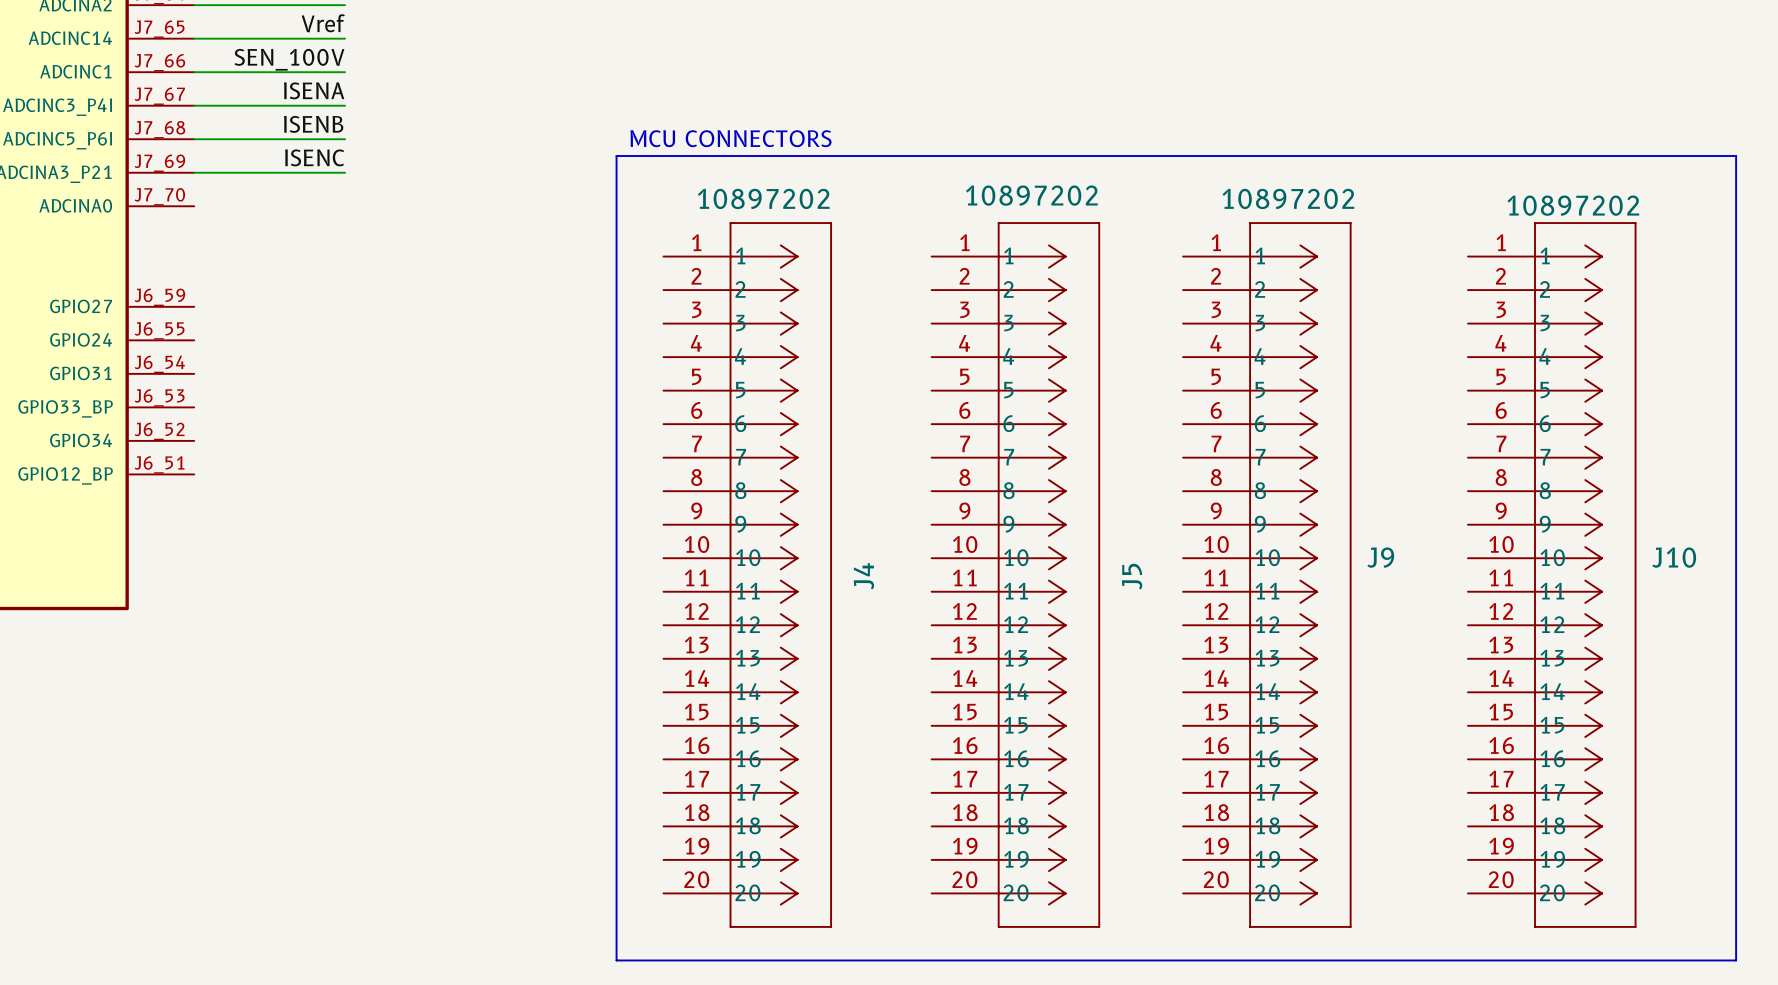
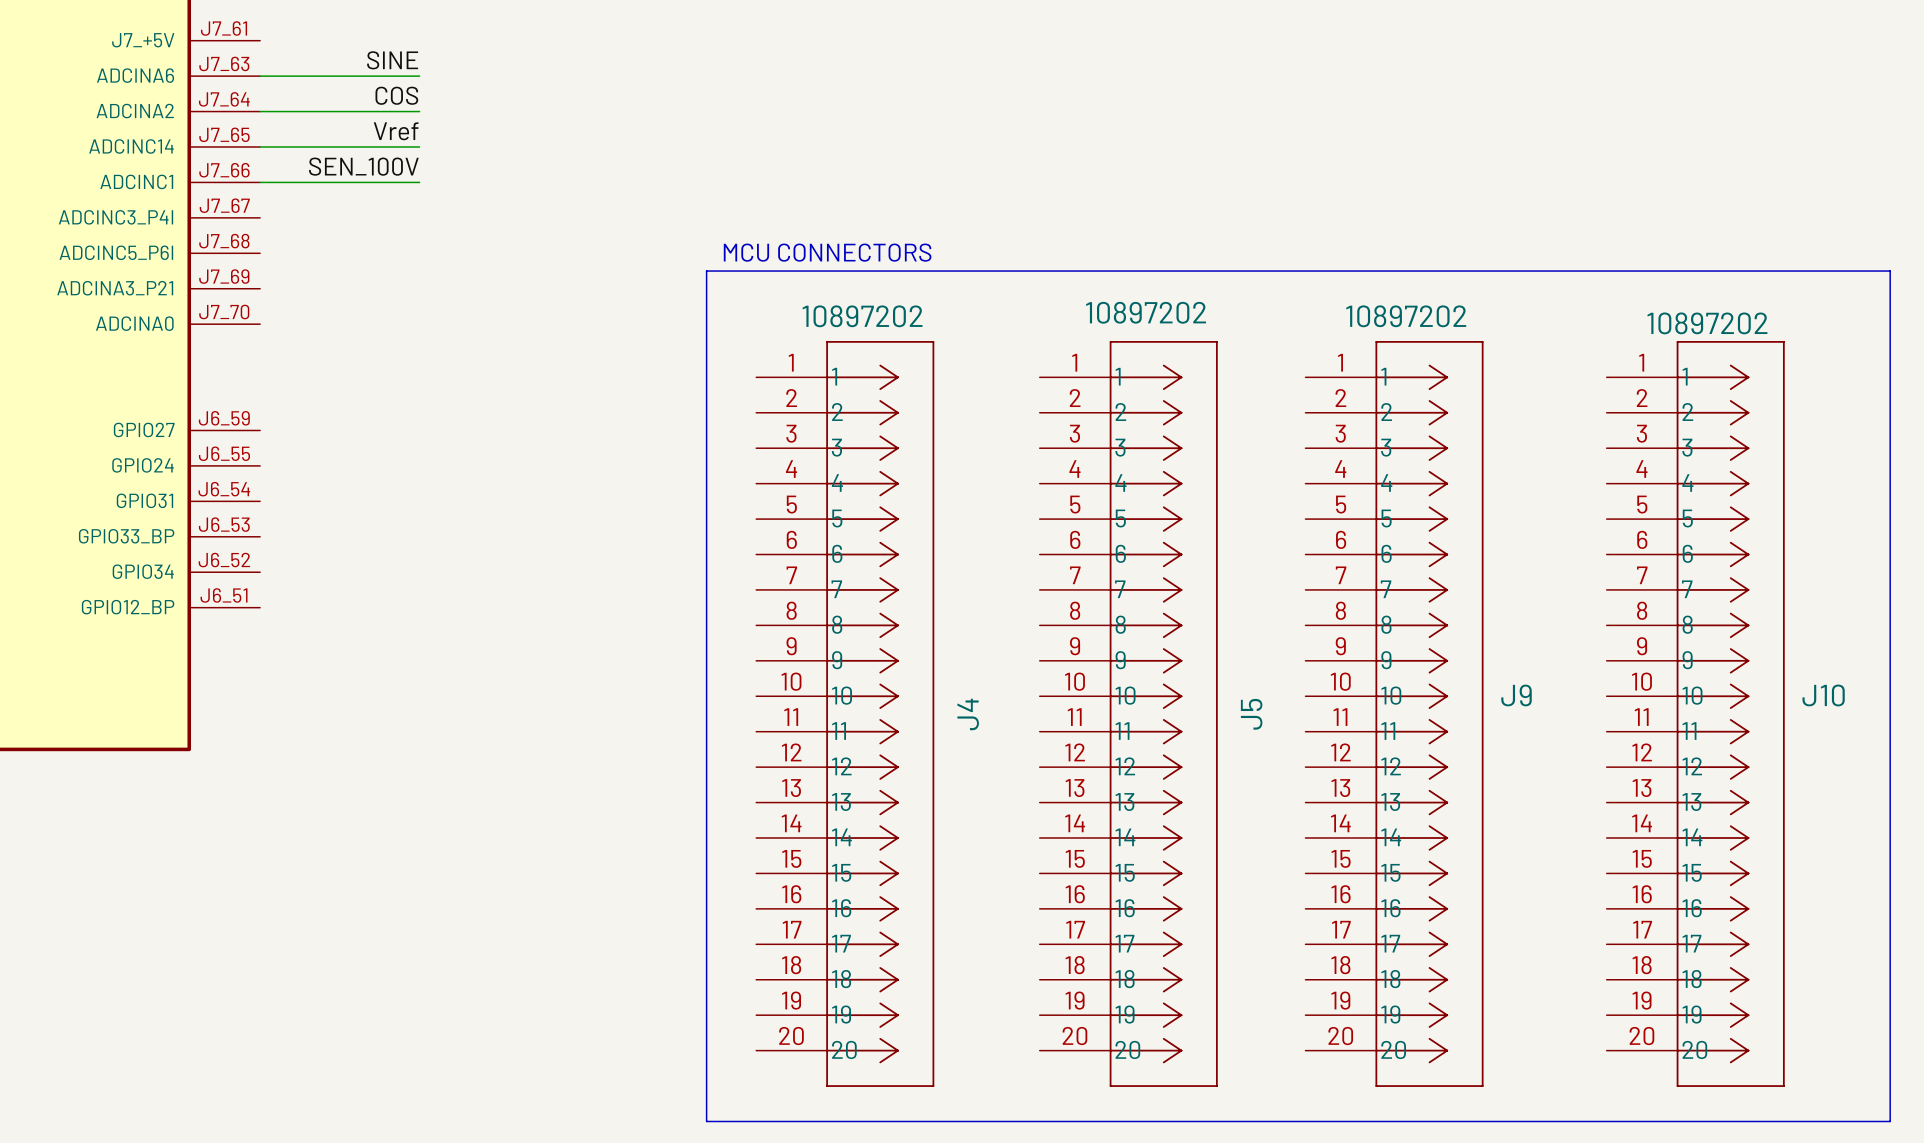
label: ISENA (314, 90) -> none
wire: (194, 105) (345, 105) -> none
label: ISENB (313, 124) -> none
wire: (194, 139) (345, 139) -> none
label: ISENC (314, 157) -> none
wire: (194, 172) (345, 172) -> none

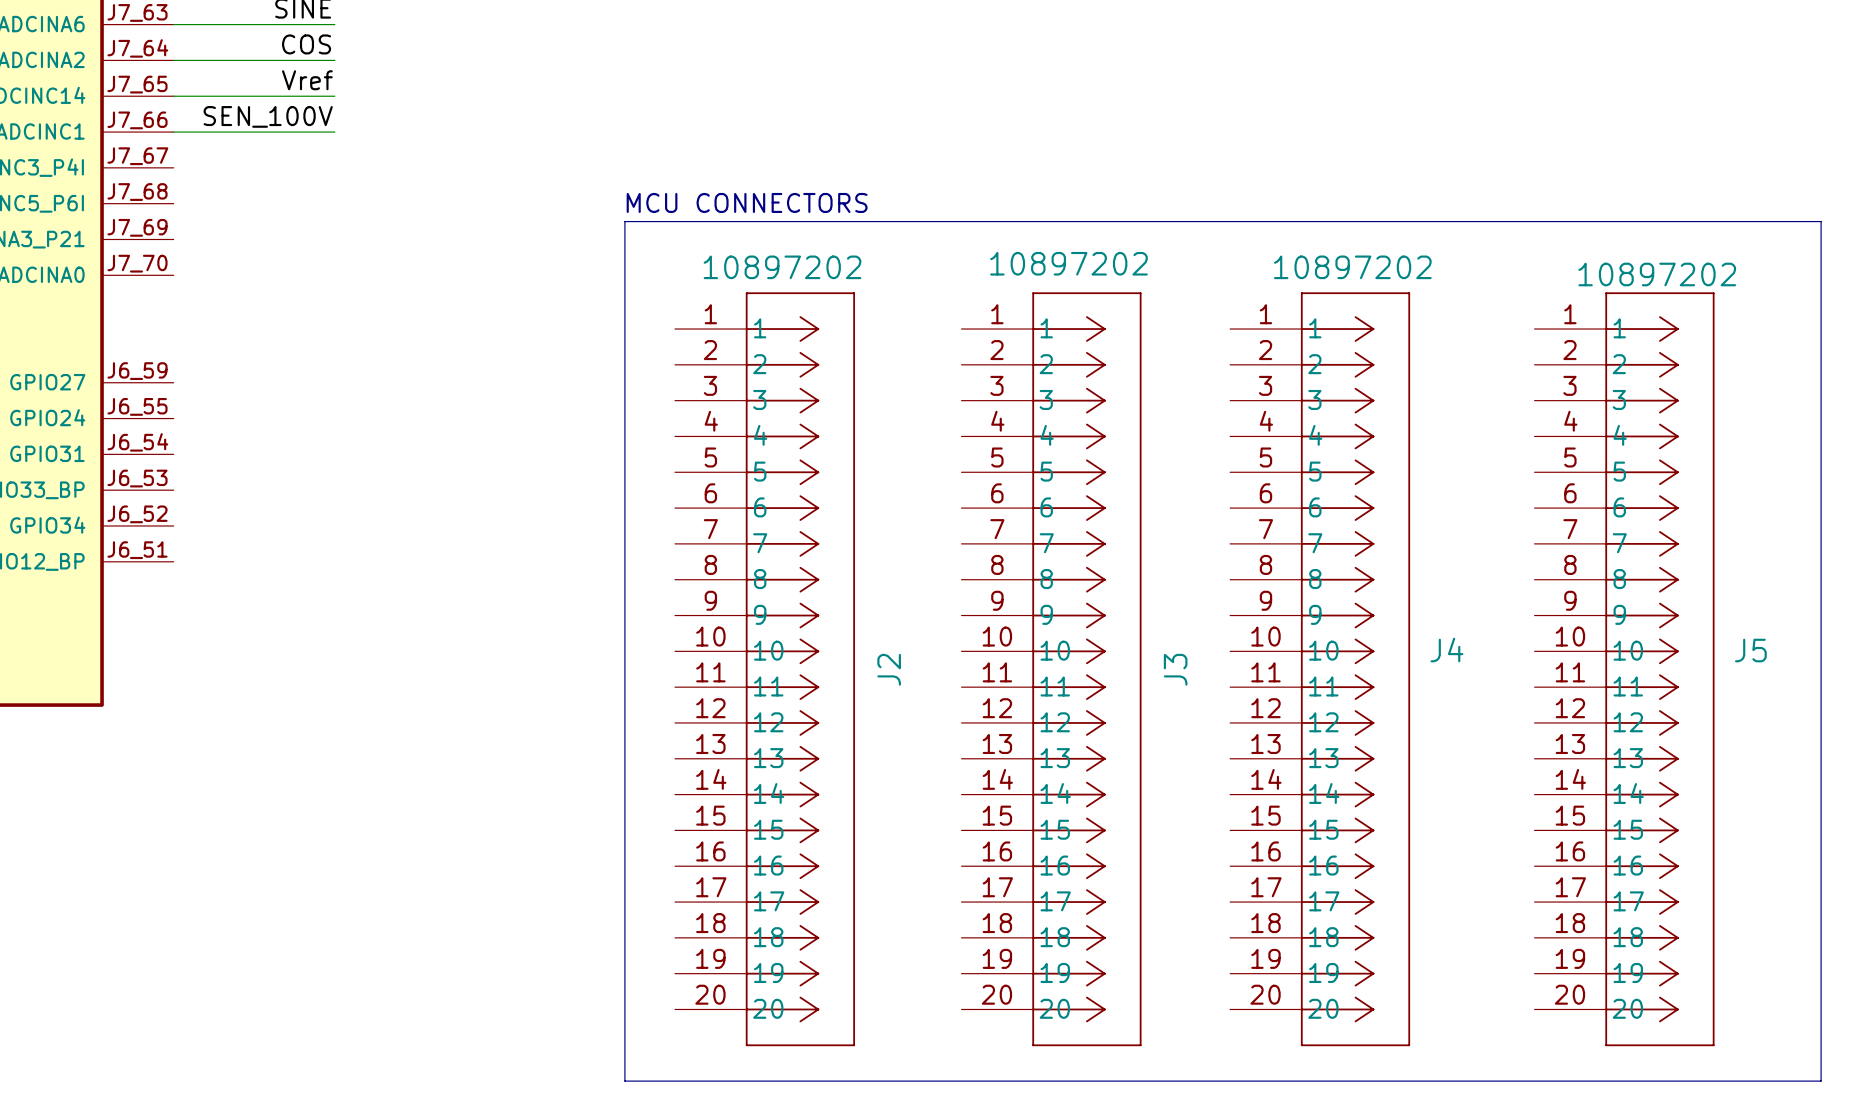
J9 name: J9 (1516, 695) -> J4 (1446, 650)
J10 name: J10 (1823, 695) -> J5 (1750, 650)
J4 name: J4 (968, 714) -> J2 (889, 669)
J5 name: J5 (1251, 714) -> J3 (1175, 669)

